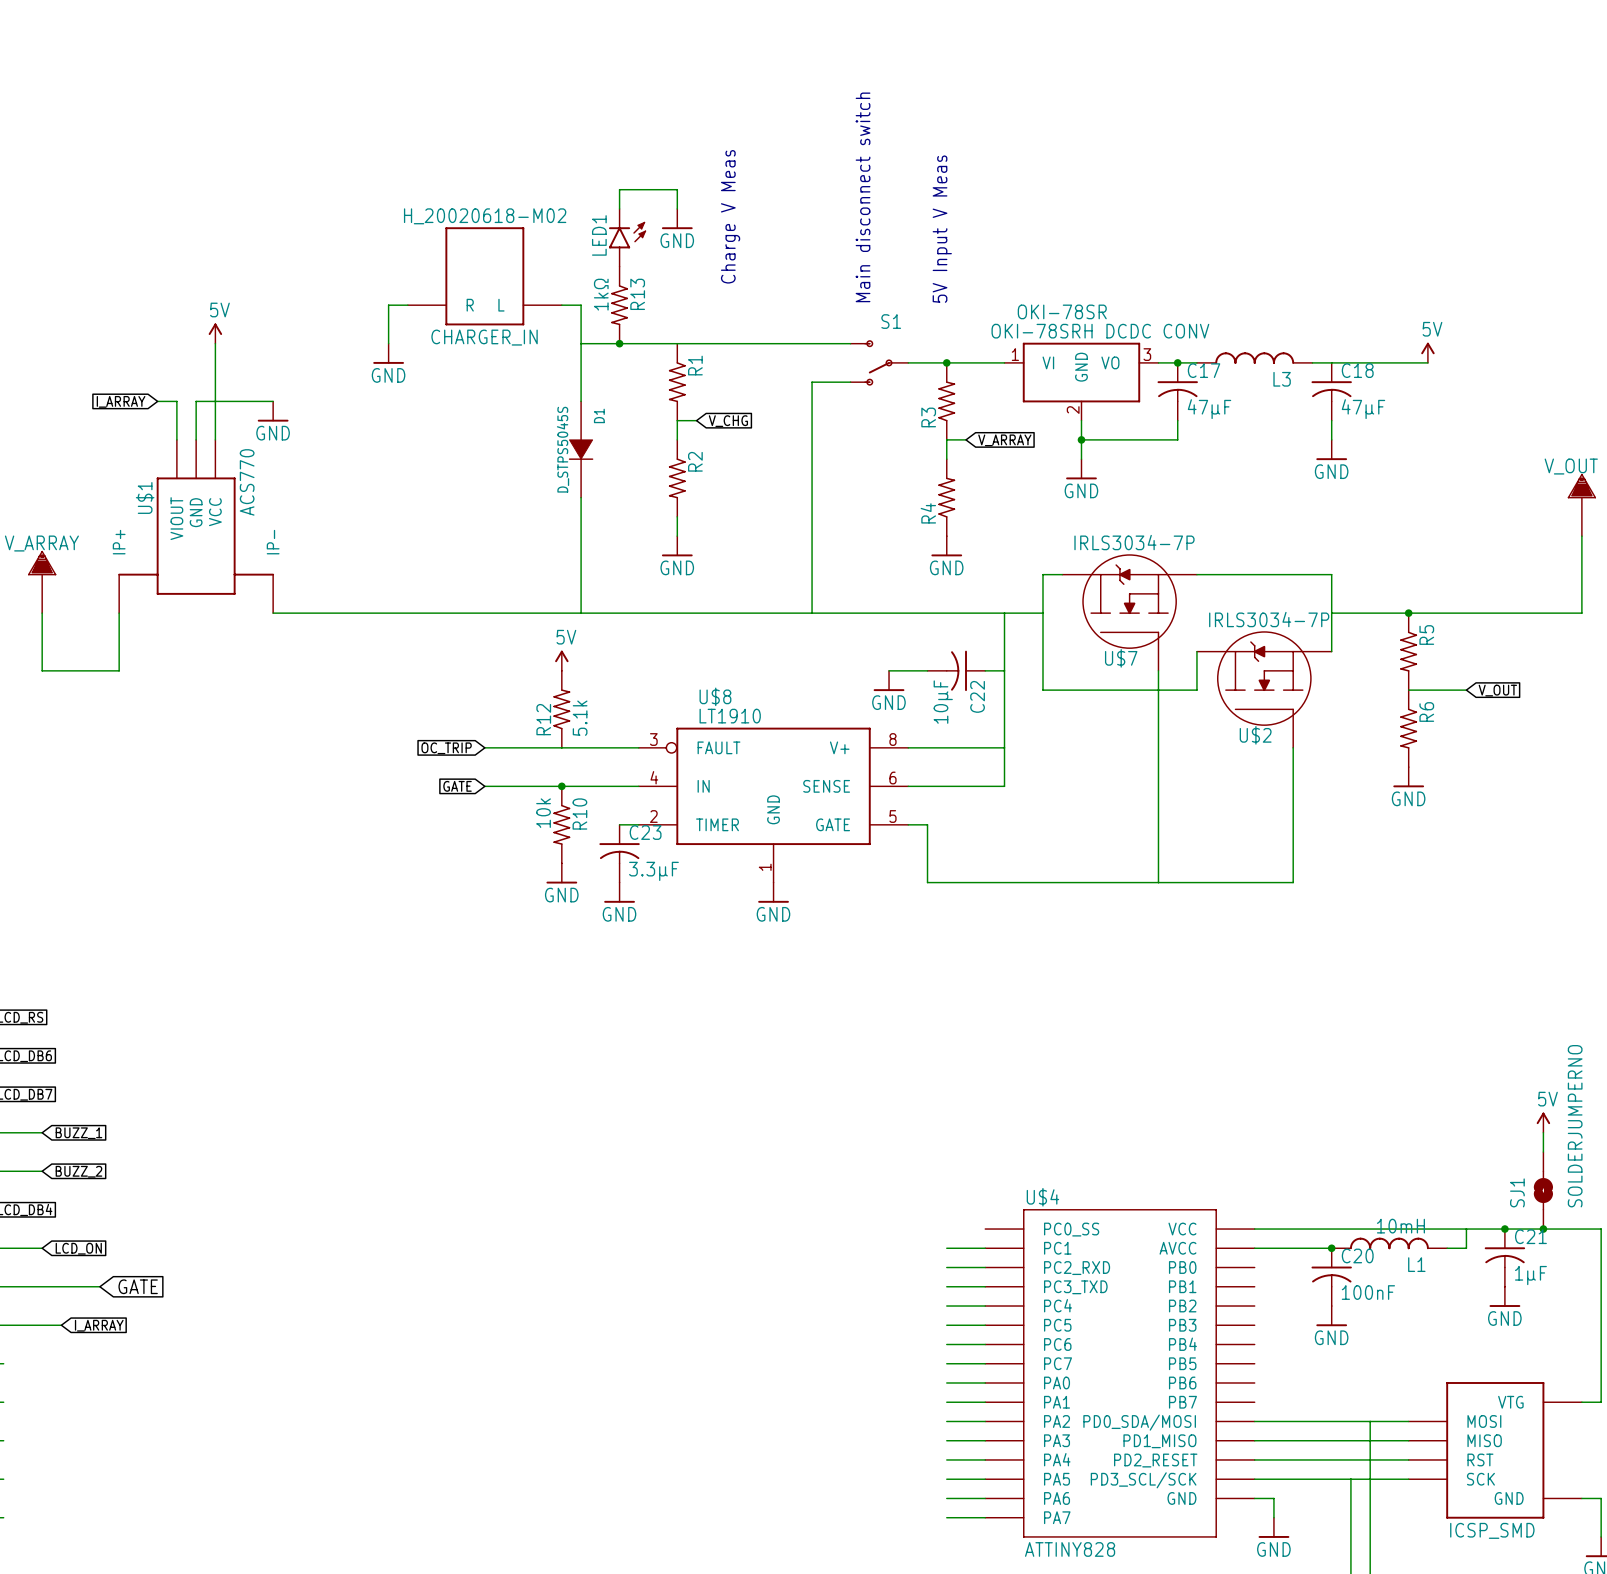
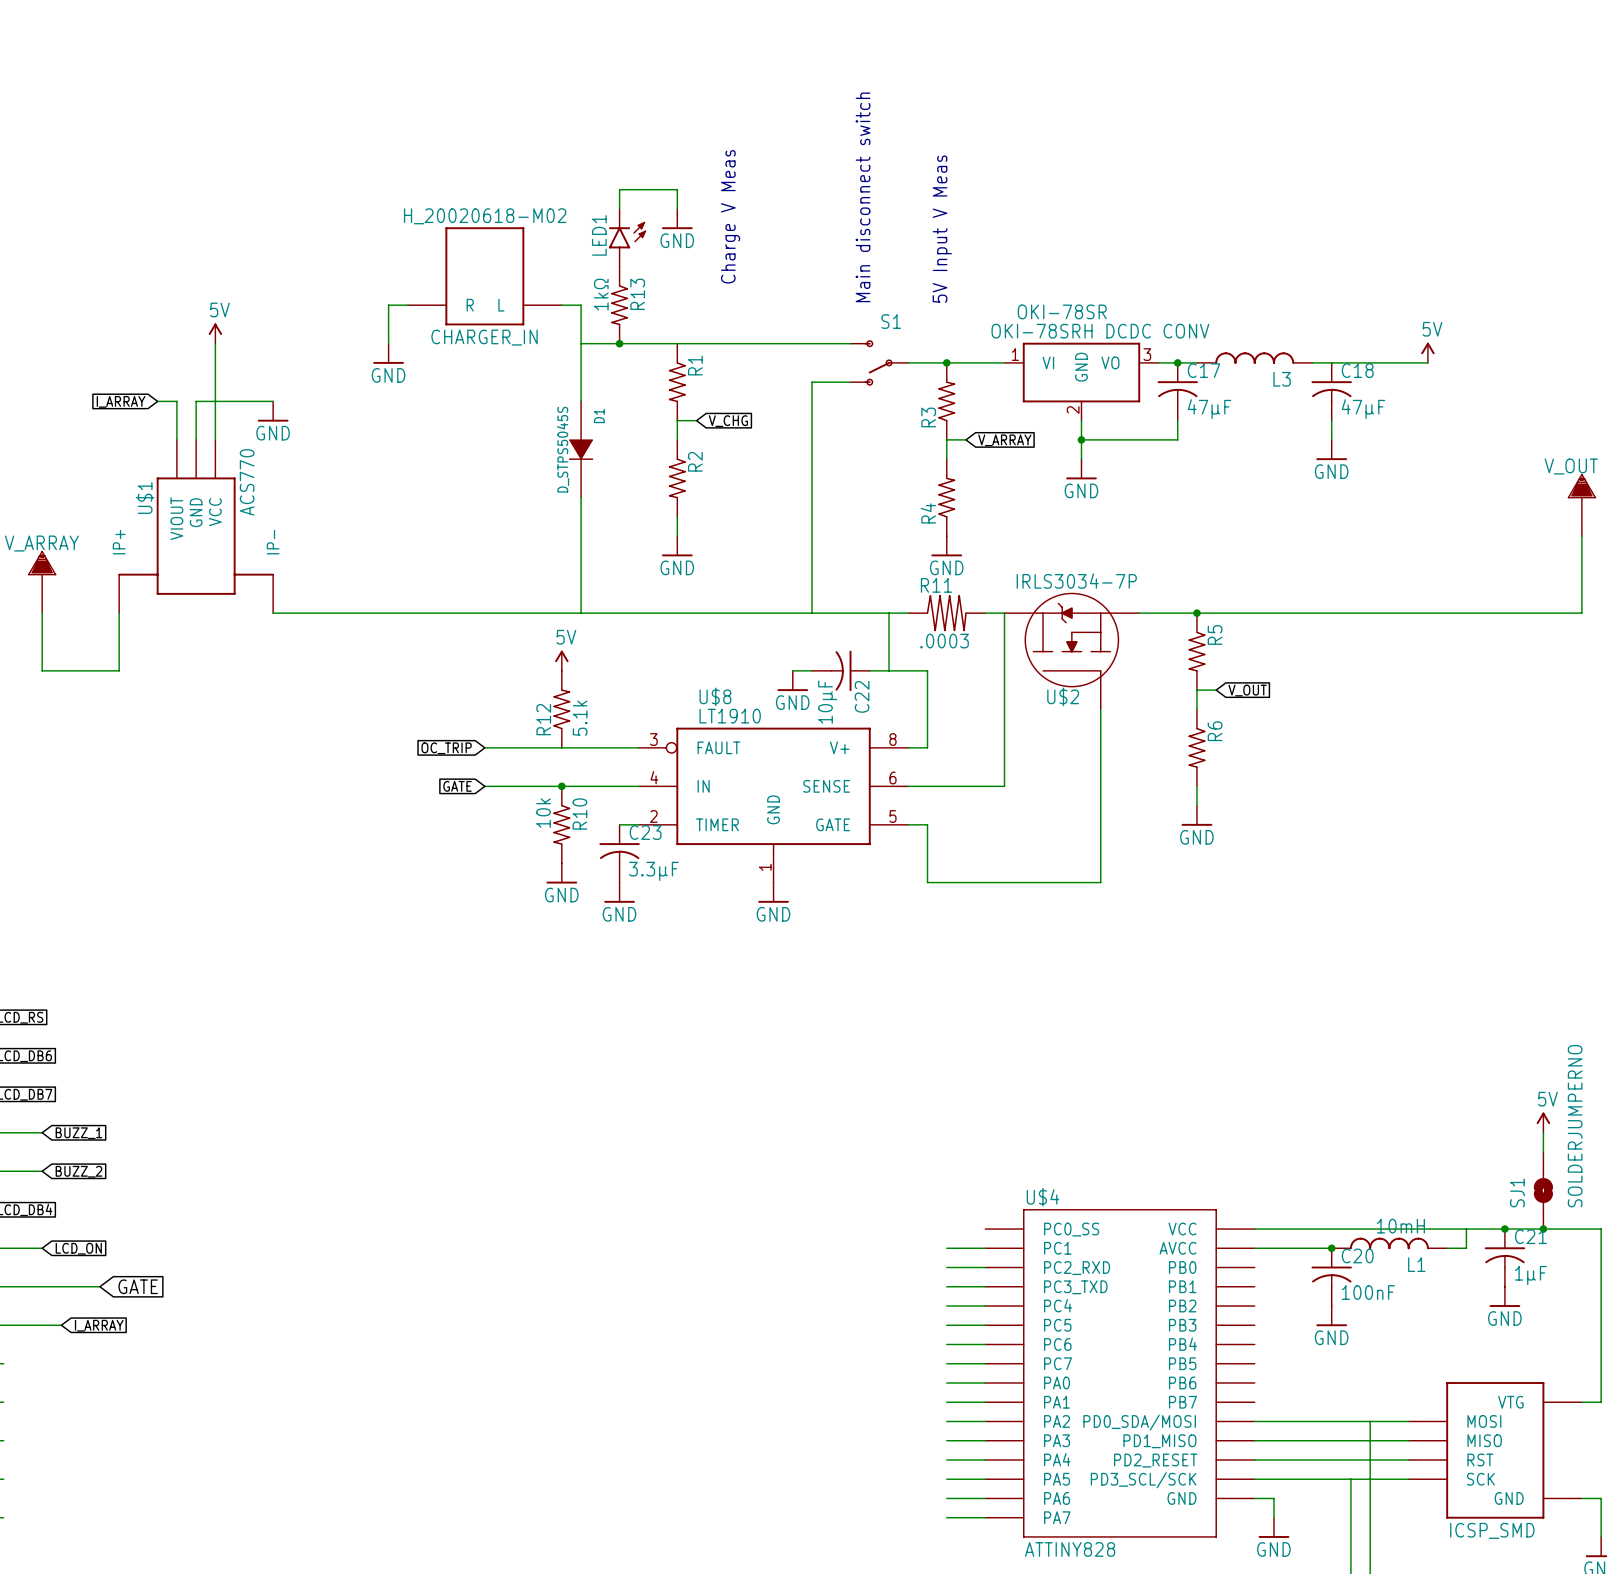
wire: (1062, 574) (1042, 574) (1042, 690) (1196, 690) (1196, 651) -> none
wire: (1196, 574) (1331, 574) (1331, 651) -> none
U$7: (1129, 612) -> none
wire: none -> (889, 613) (889, 670) (869, 670)
R11: none -> .0003 (946, 613)
wire: none -> (1139, 613) (1331, 613)
junction: none -> (1196, 613)
junction: (1408, 613) -> none
R5 position: (1408, 651) -> (1196, 651)
wire: none -> (792, 670) (812, 670)
C22 position: (956, 670) -> (840, 670)
wire: (985, 670) (1004, 670) -> none
wire: (1158, 670) (1158, 882) -> none
power symbol position: GND (889, 680) -> GND (792, 680)
U$2 position: (1264, 689) -> (1071, 651)
wire: none -> (1216, 690) (1196, 690) (1196, 709)
global label: none -> V_OUT (1247, 690)
wire: (1408, 690) (1466, 690) -> none
global label: V_OUT (1497, 690) -> none
R6 position: (1408, 728) -> (1196, 747)
wire: (927, 747) (1004, 747) -> (927, 747) (927, 670)
wire: (1293, 747) (1293, 882) (1100, 882) -> (1100, 709) (1100, 882)
power symbol: GND (1408, 777) -> none
wire: none -> (1196, 786) (1196, 805)
power symbol: none -> GND (1196, 815)

